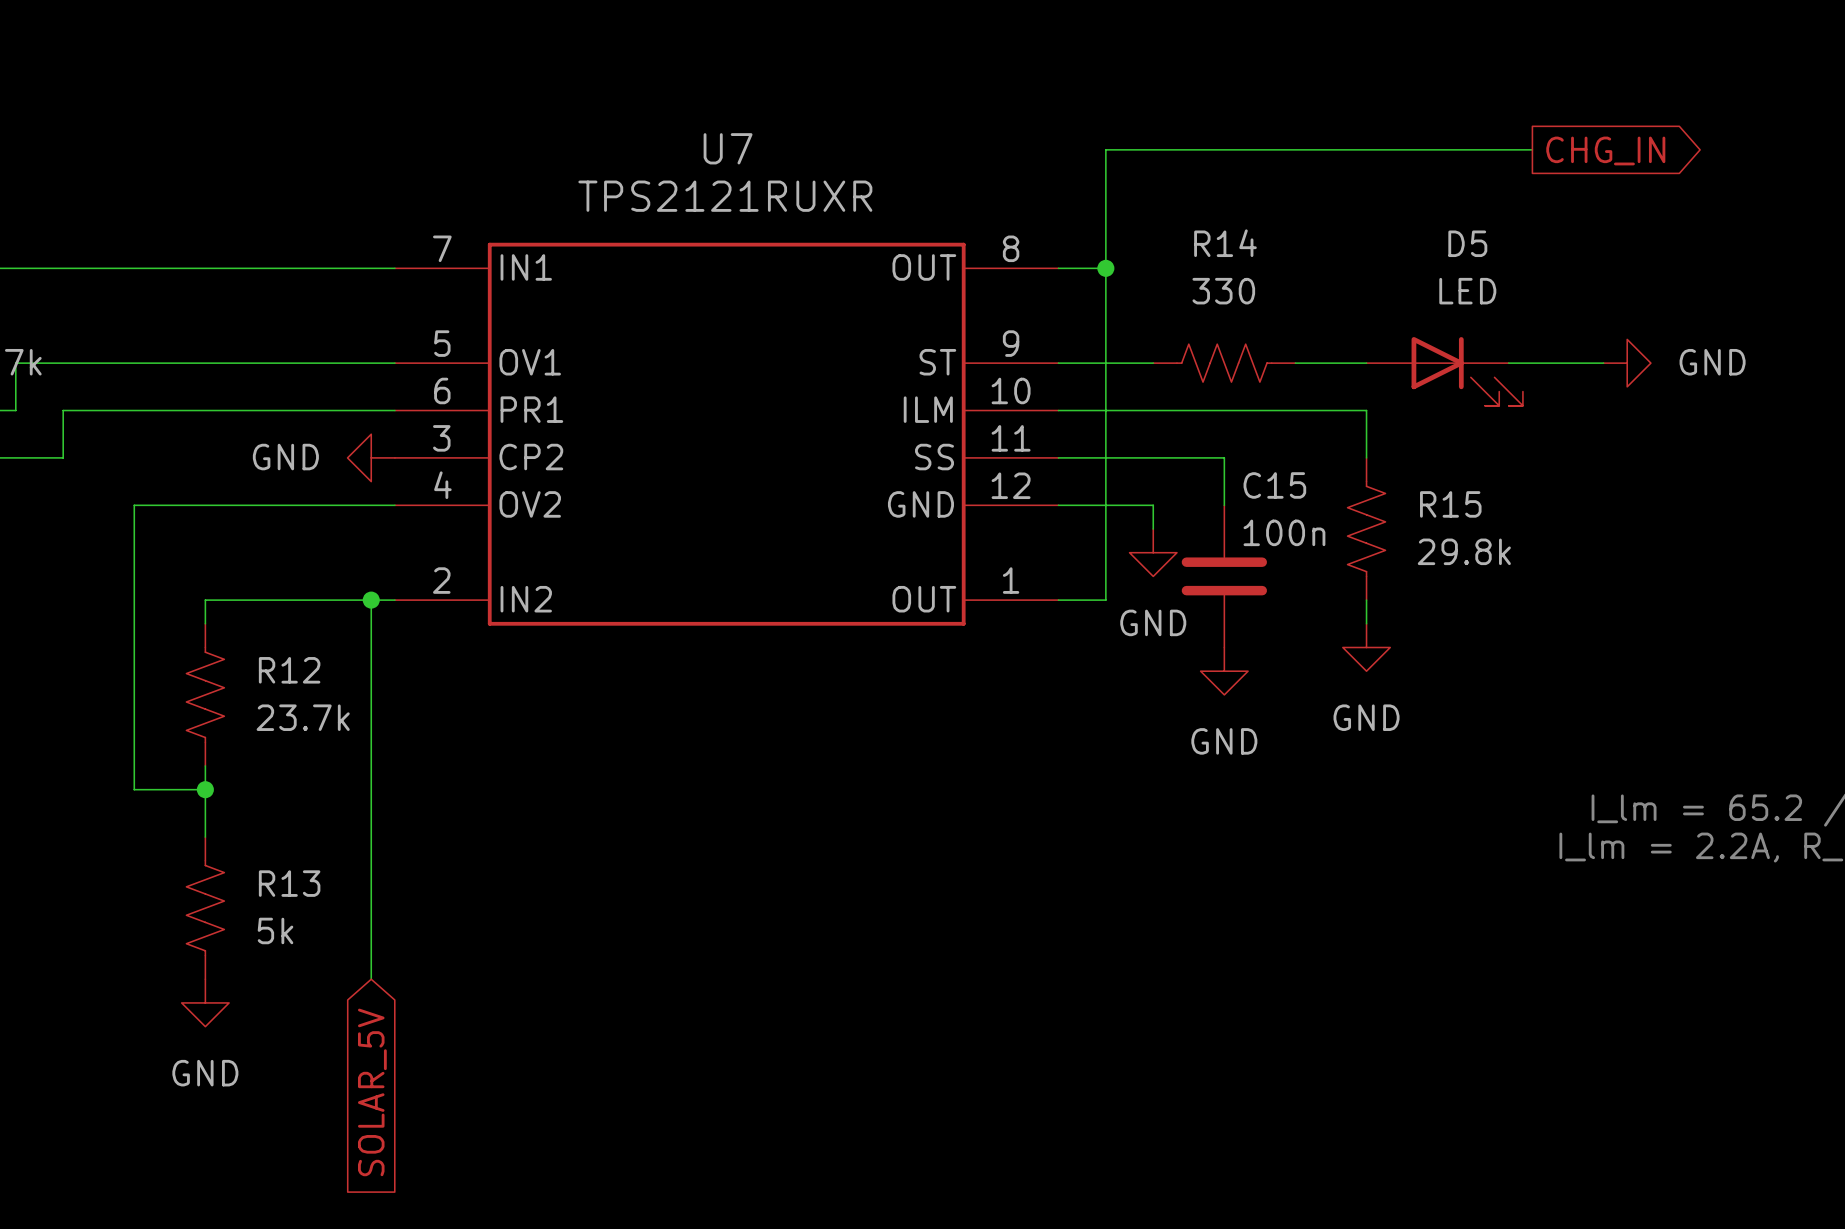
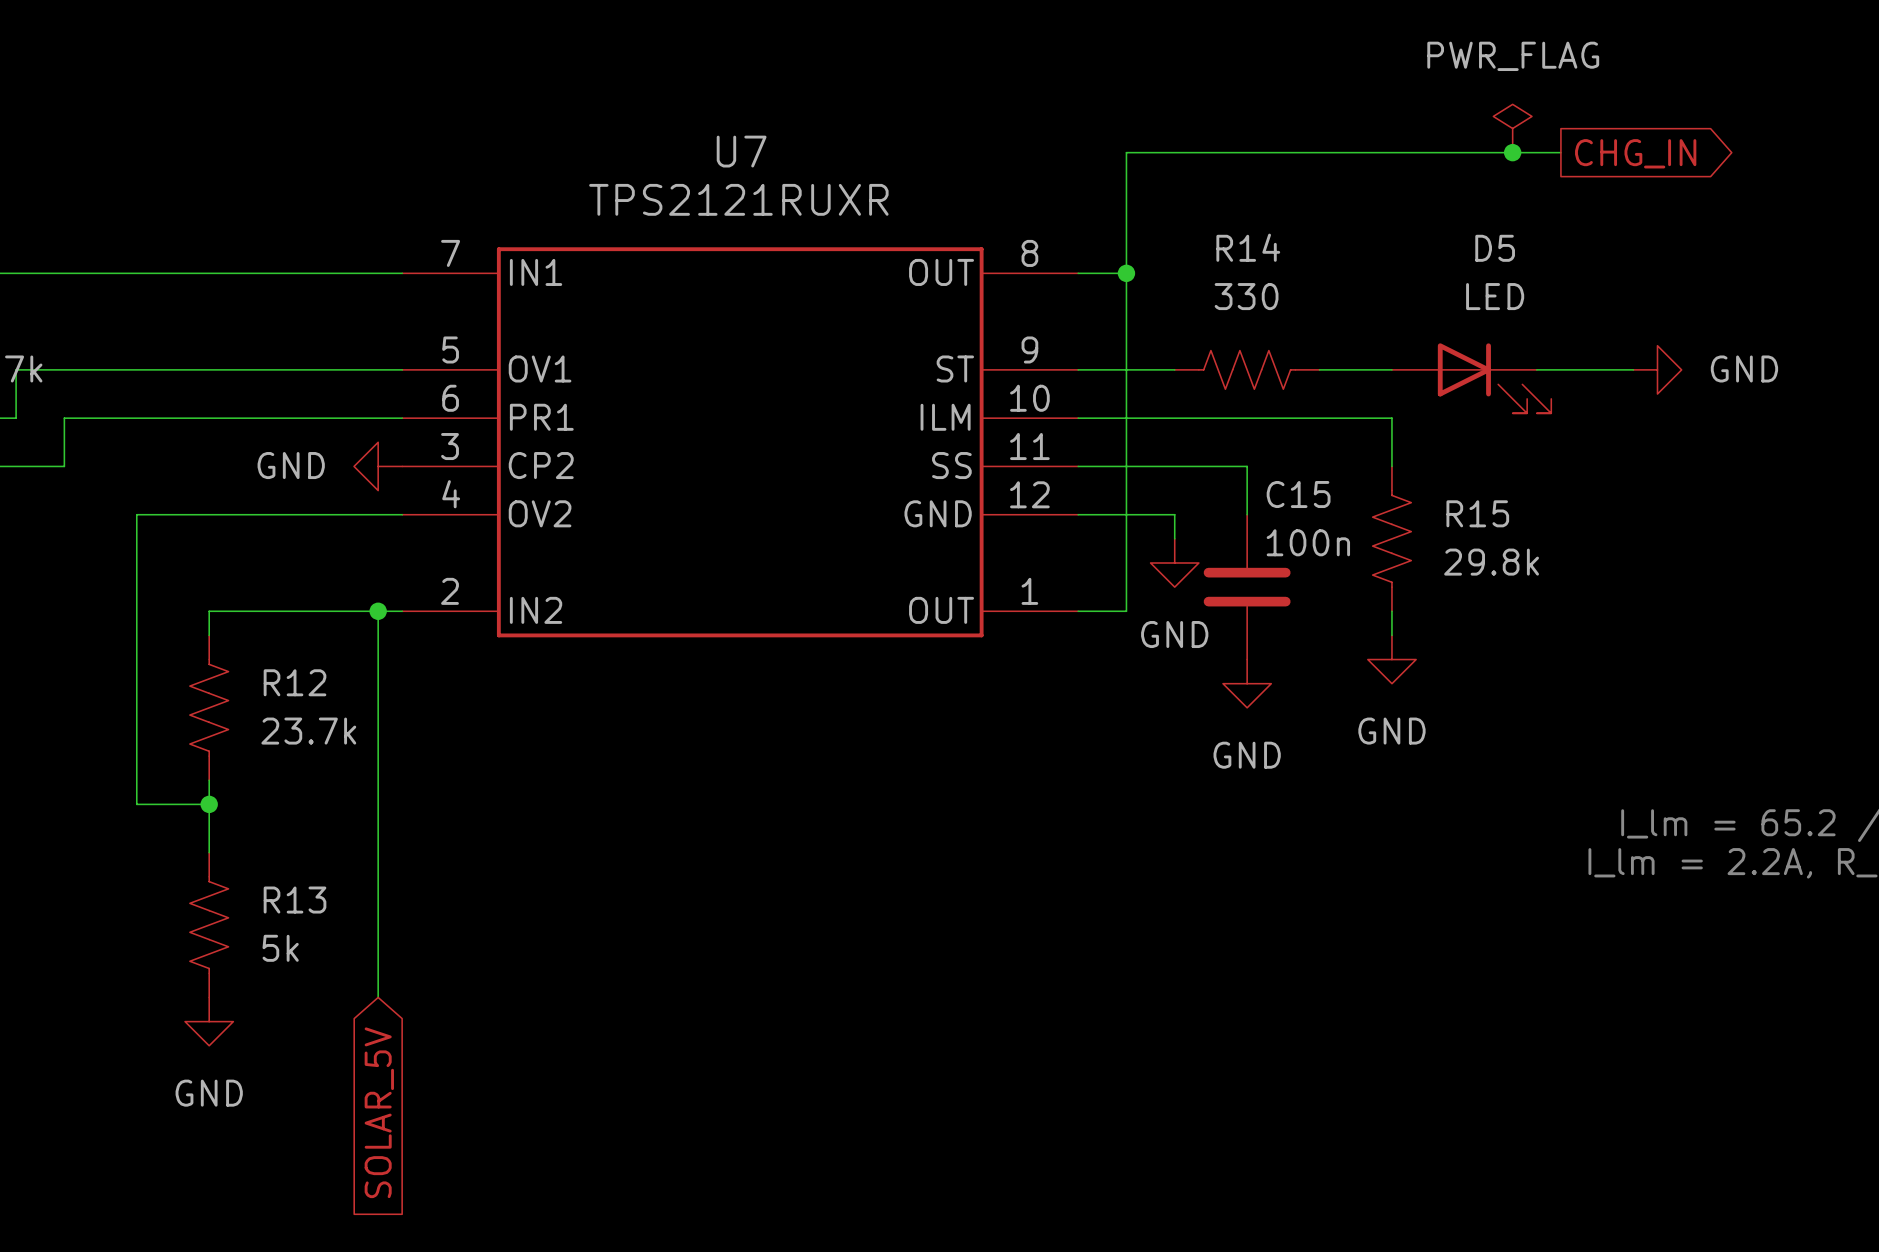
power symbol: none -> PWR_FLAG (1512, 128)
junction: none -> (1512, 152)

